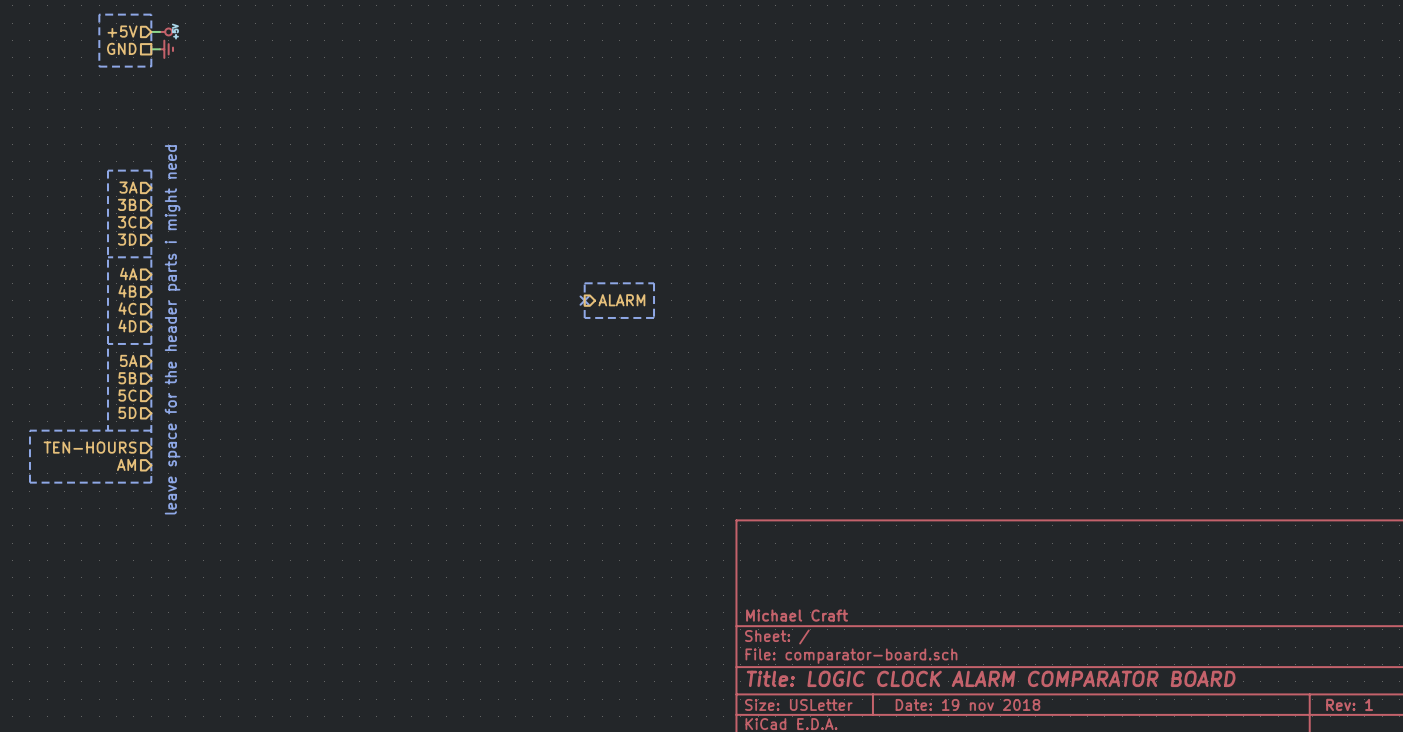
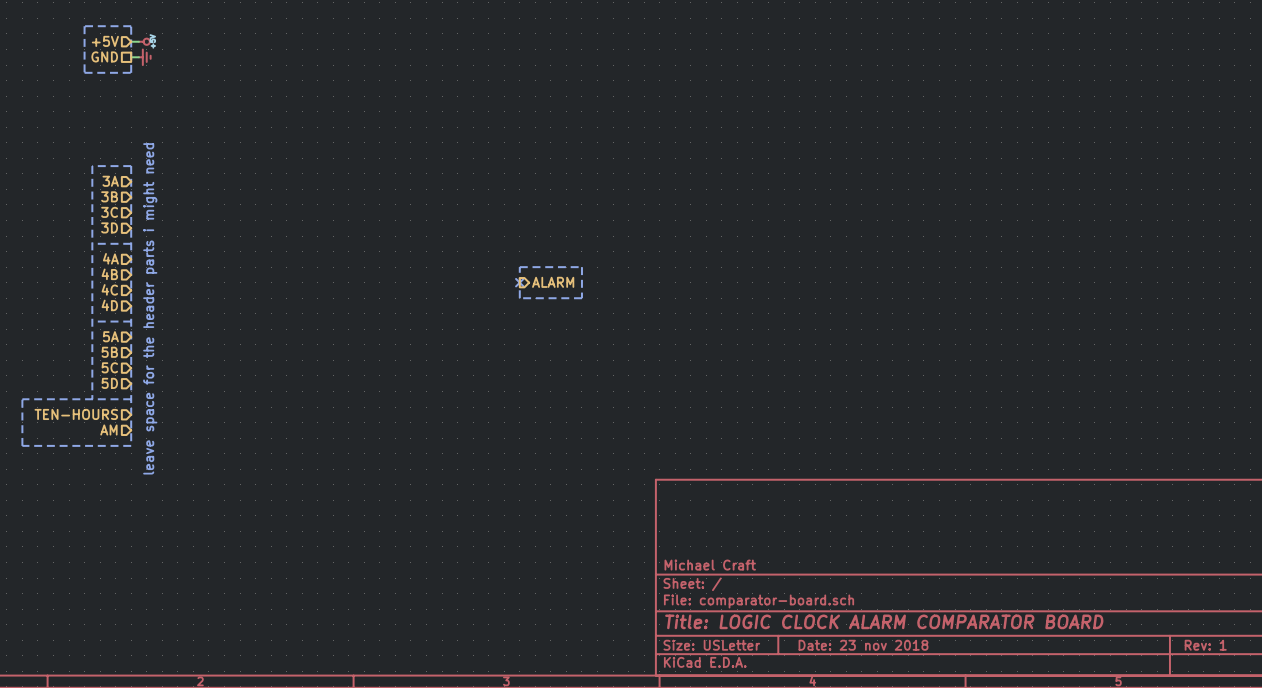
title block: Date: 19 nov 2018 (967, 704) -> Date: 23 nov 2018 (863, 645)

